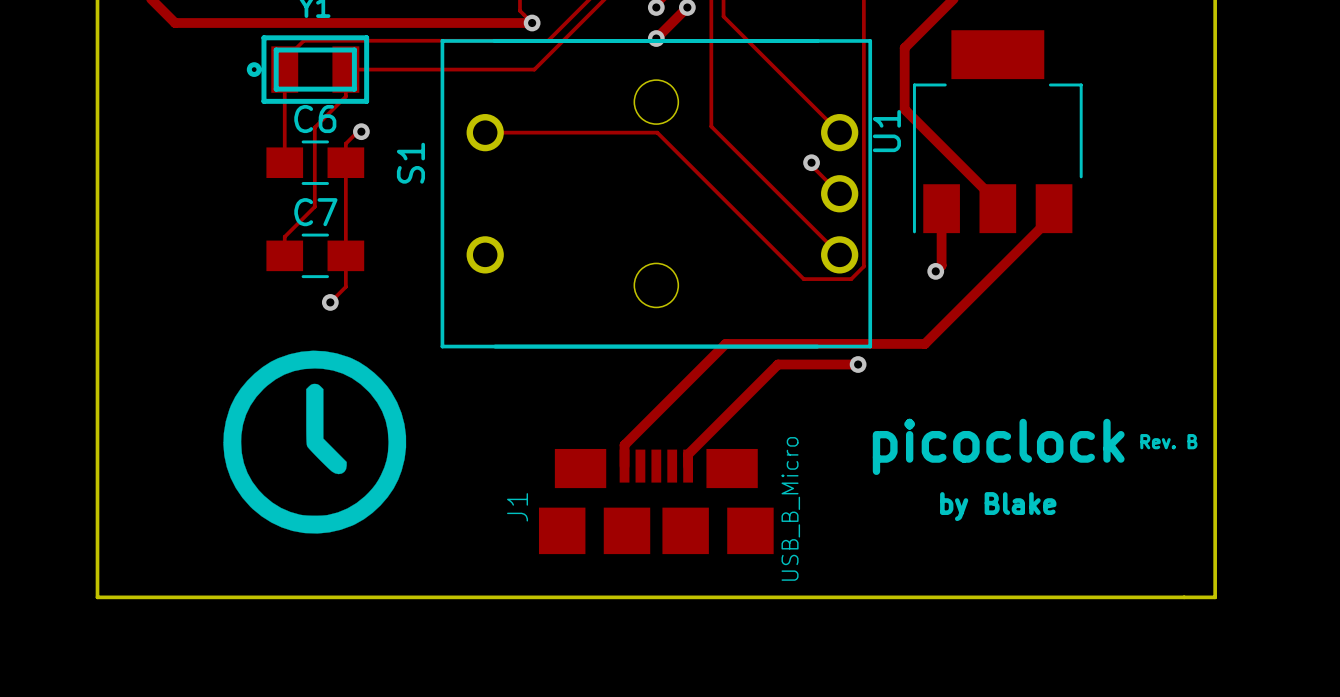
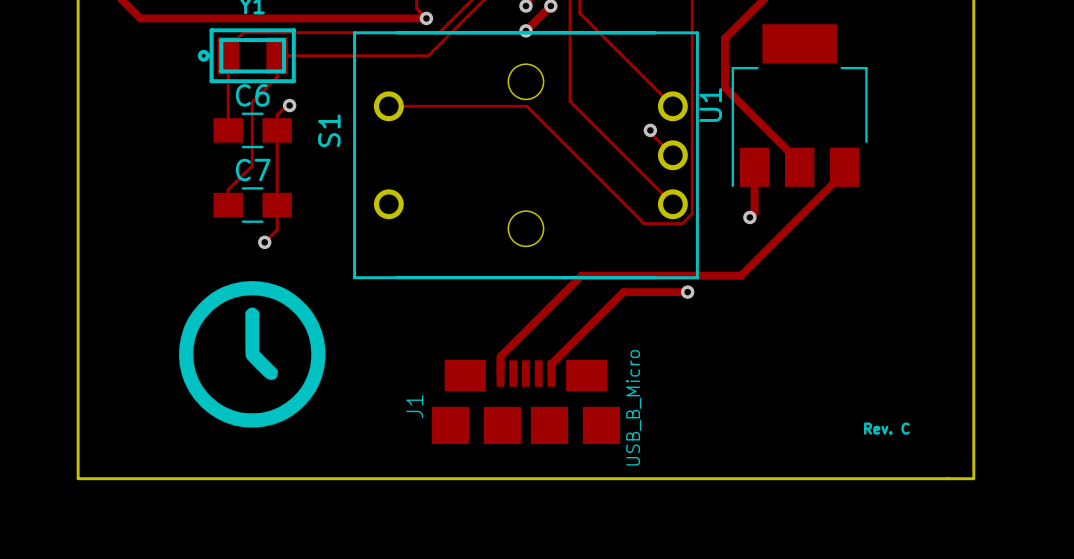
text: Rev. B (1168, 441) -> none
text: picoclock (998, 446) -> none
text: by Blake (998, 506) -> none
text: none -> Rev. C (886, 428)

